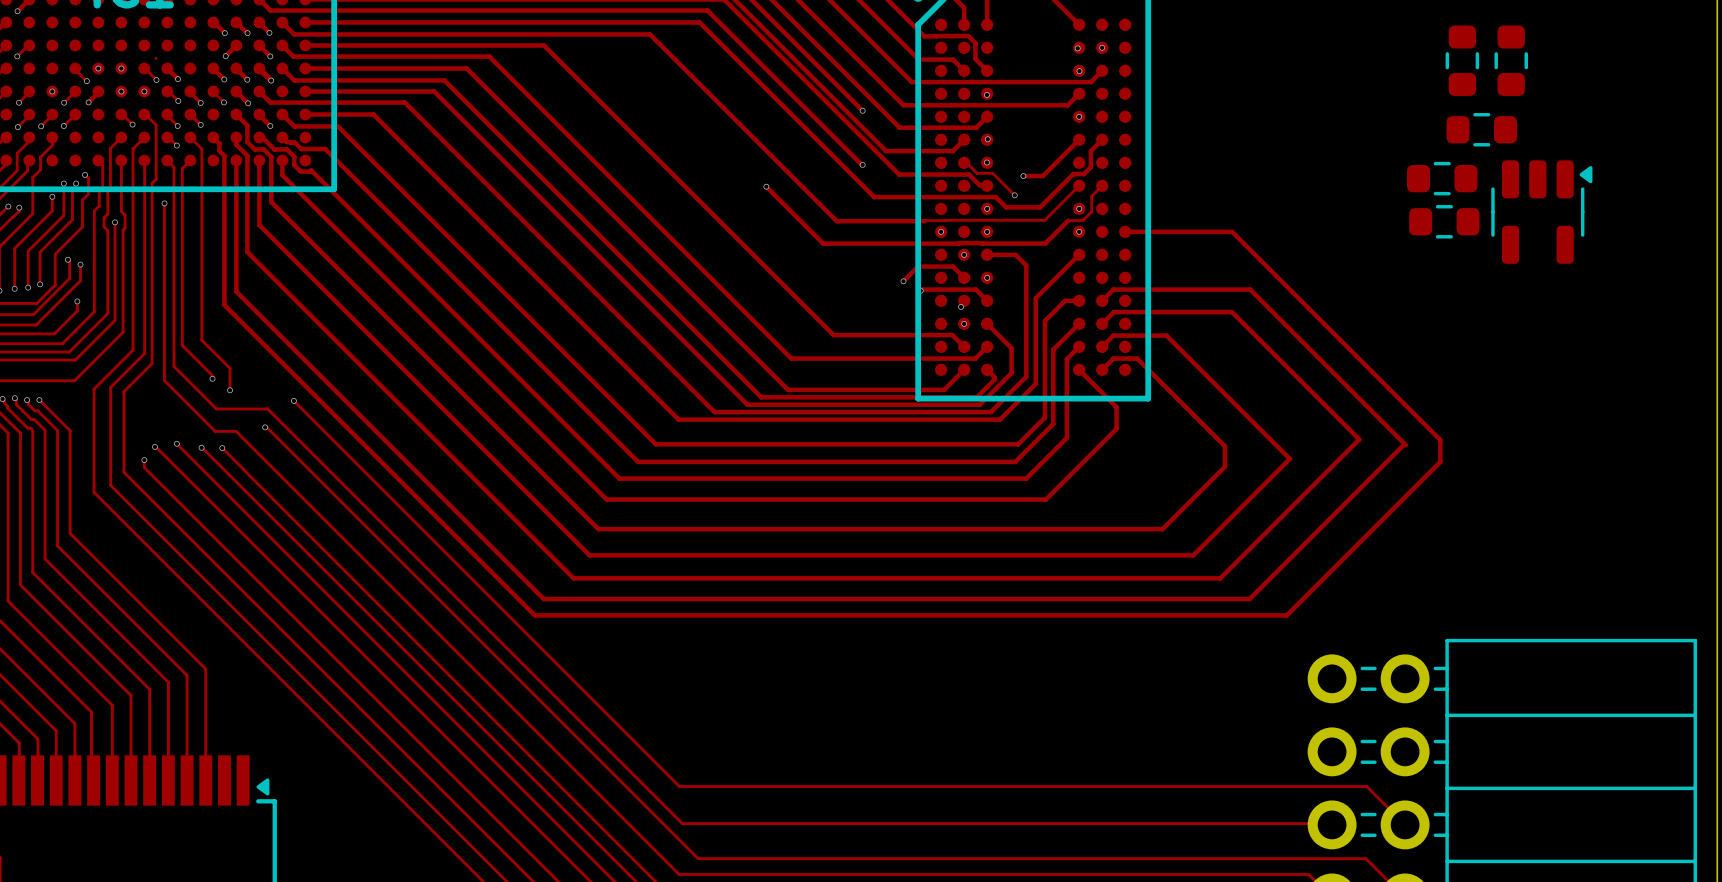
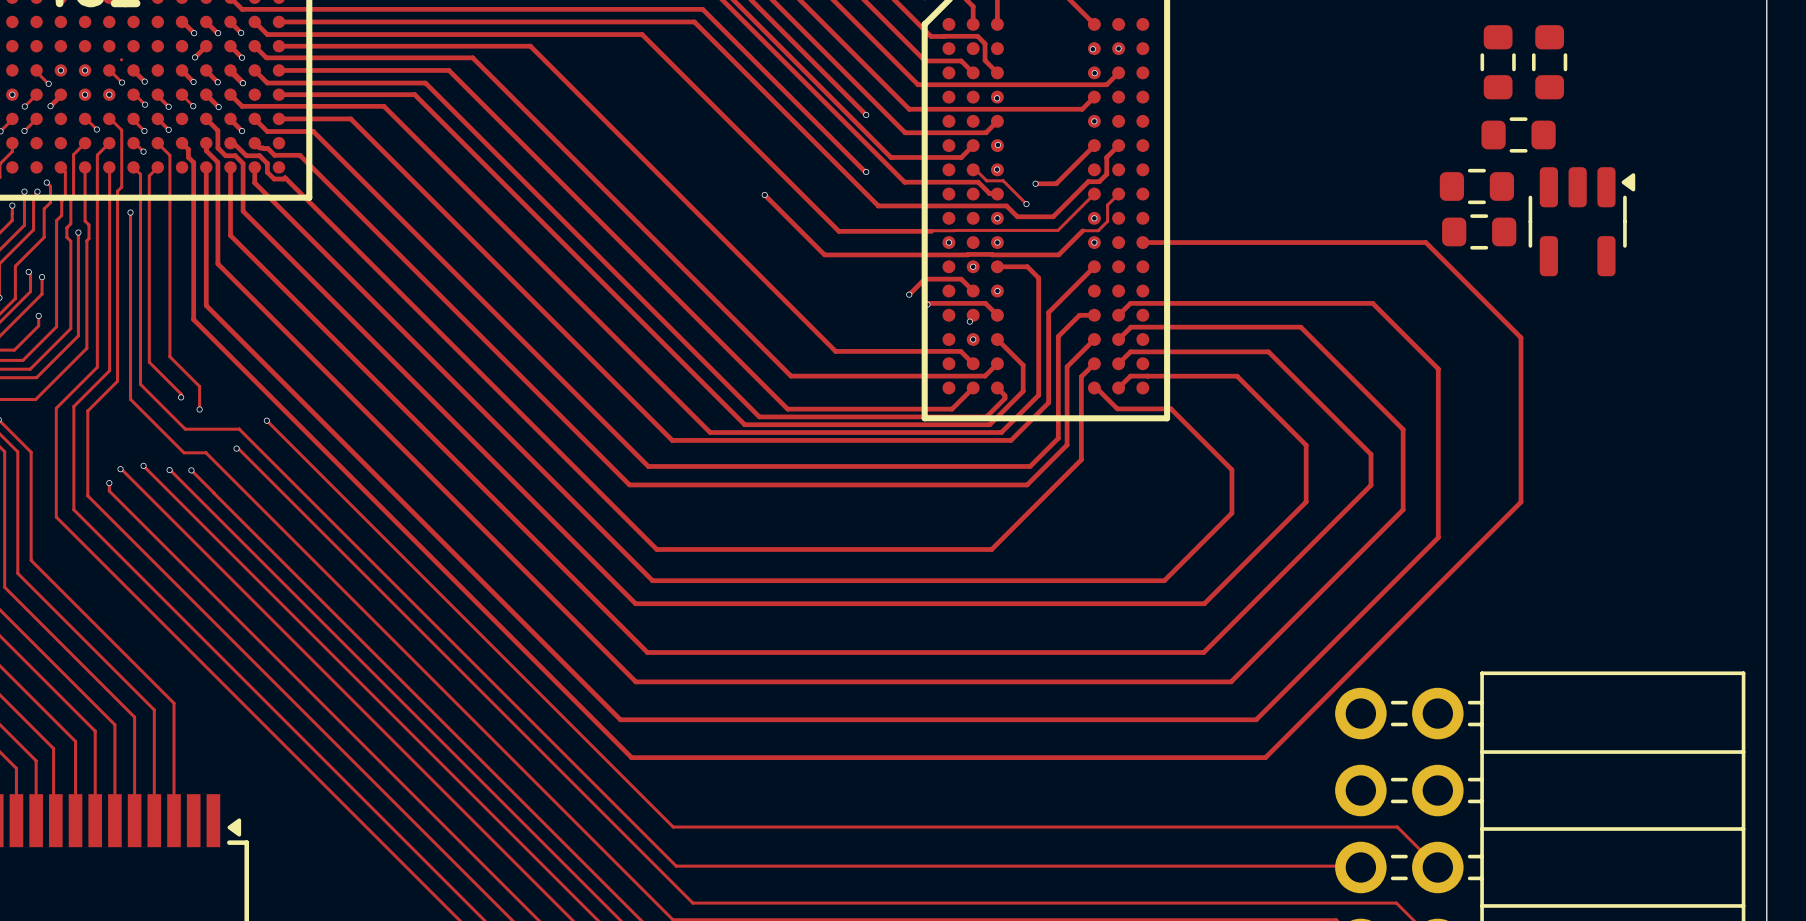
track: (1232, 231) (1440, 440) (1440, 461) (1286, 615) (534, 615) -> (1255, 242) (1425, 242) (1521, 337) (1521, 502) (1265, 757) (631, 757) (520, 646)
track: (1250, 289) (1405, 444) (1249, 599) (543, 599) -> (1274, 303) (1372, 303) (1438, 368) (1438, 537) (1256, 719) (620, 719) (530, 629)
track: (1231, 312) (1359, 439) (1220, 578) (573, 578) -> (1255, 327) (1300, 327) (1403, 429) (1403, 509) (1231, 681) (635, 681) (561, 607)
track: (1166, 335) (1289, 458) (1193, 555) (589, 555) -> (1186, 351) (1268, 351) (1371, 454) (1371, 485) (1203, 652) (647, 652) (578, 583)
track: (1137, 358) (1224, 446) (1224, 466) (1162, 529) (598, 529) -> (1155, 376) (1237, 376) (1306, 445) (1306, 501) (1204, 603) (635, 603) (587, 555)
track: (1079, 369) (1116, 407) (1116, 428) (1045, 499) (606, 499) -> (1094, 387) (1117, 408) (1171, 408) (1231, 469) (1231, 513) (1164, 580) (652, 580) (596, 524)
track: (619, 478) (1026, 478) -> (609, 502) (656, 549) (991, 549) (1038, 502)

